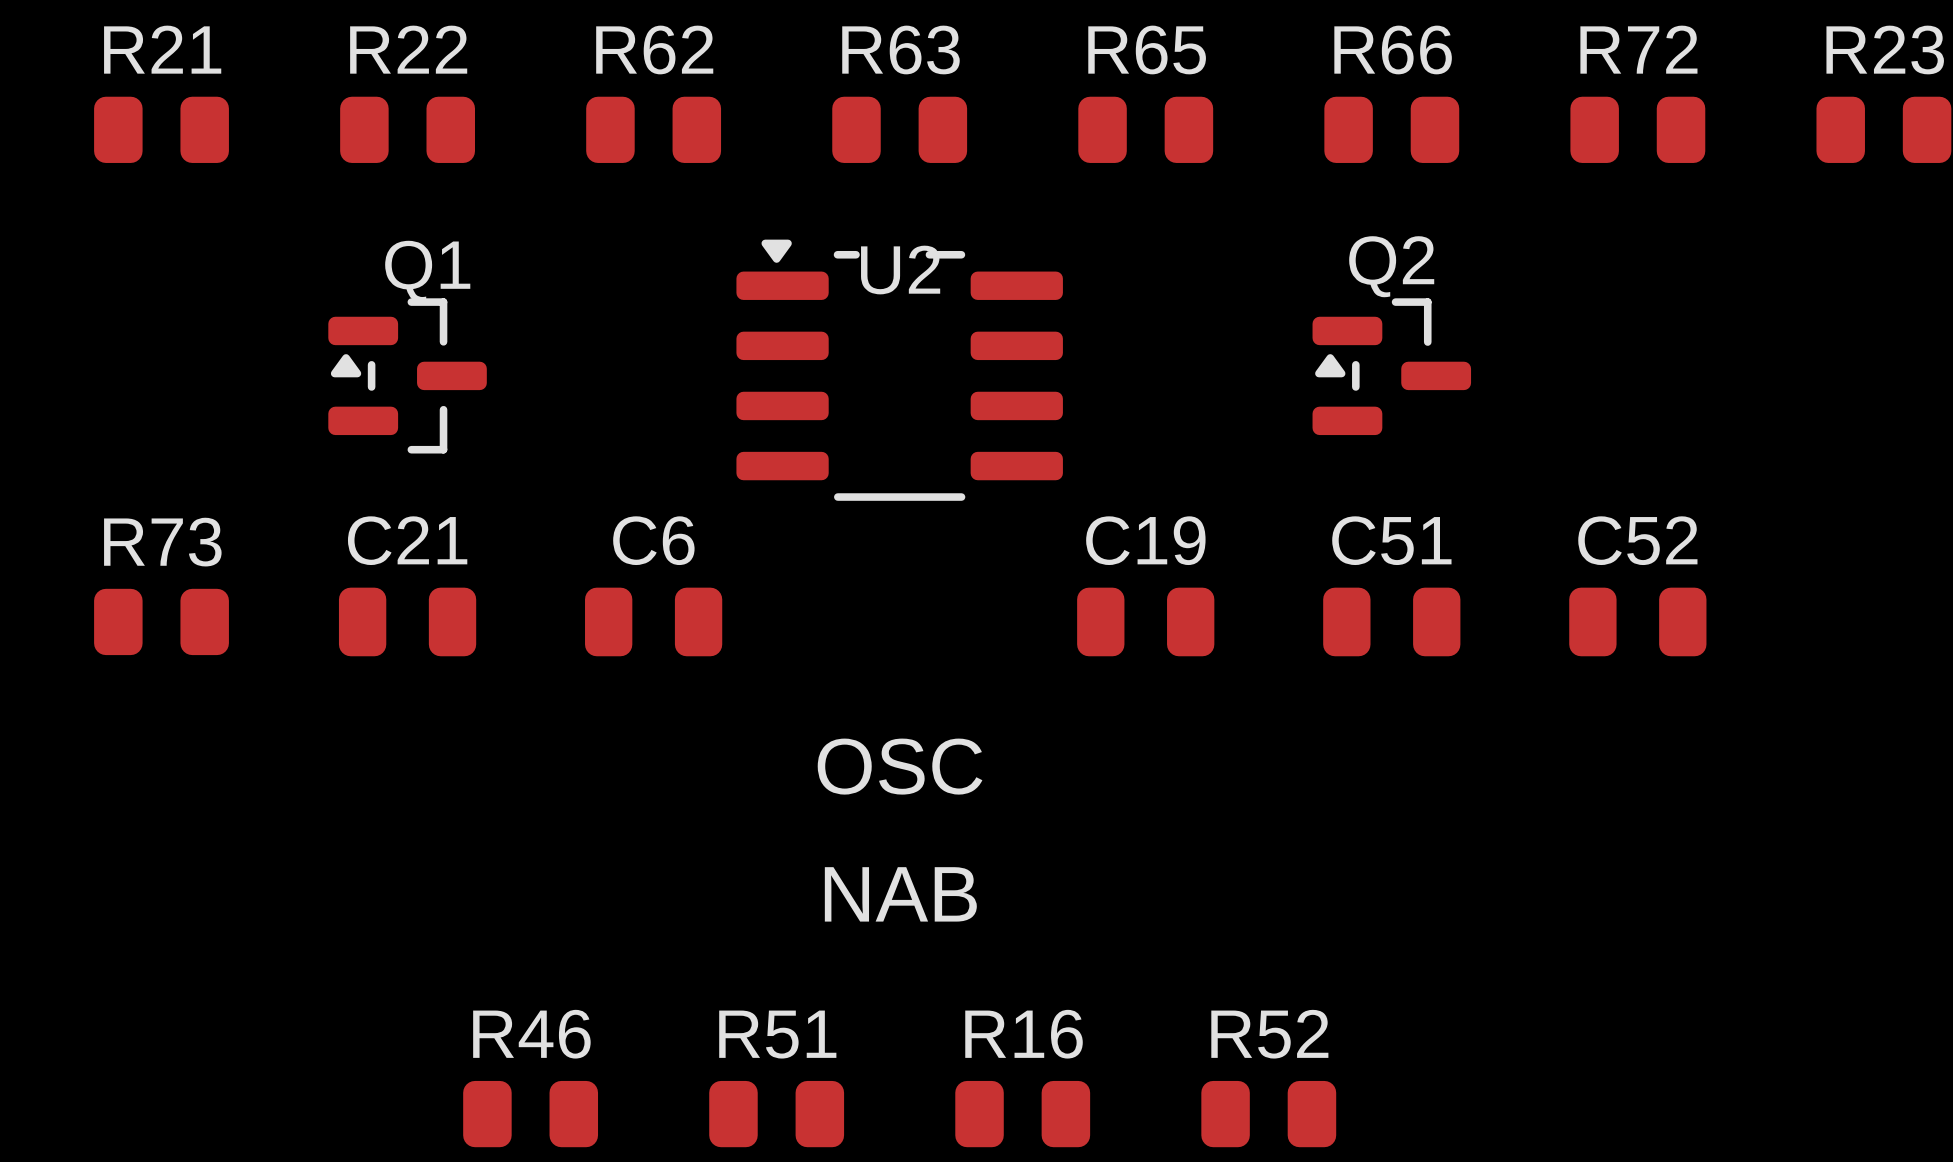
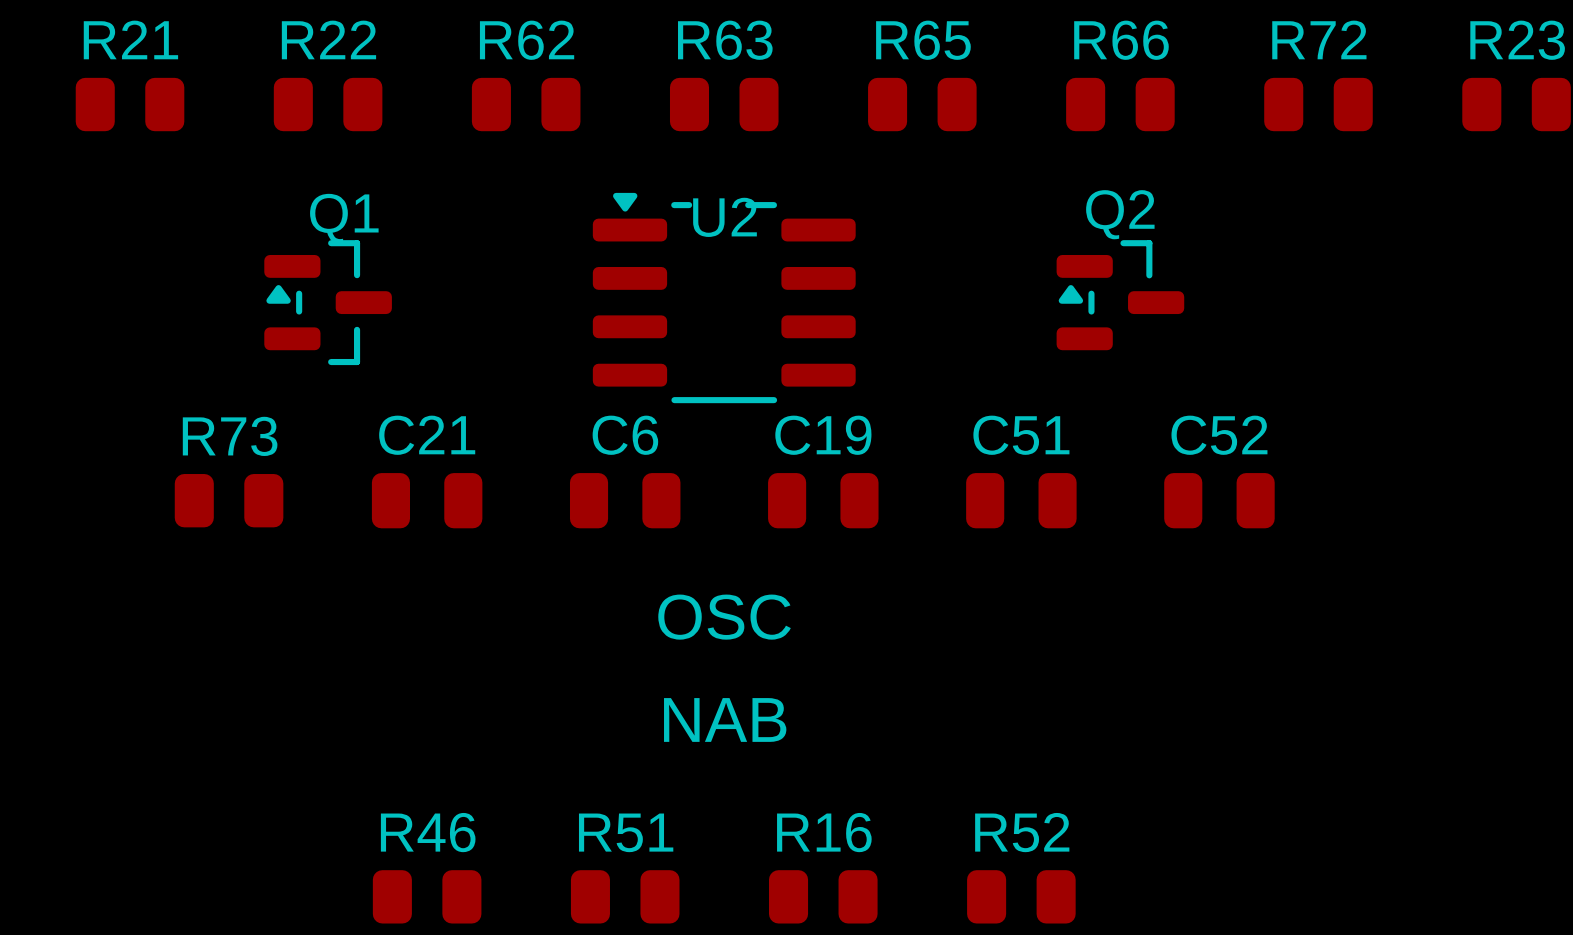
R73 position: (161, 621) -> (229, 500)
C21 position: (407, 621) -> (427, 500)
C6 position: (653, 621) -> (625, 500)
C19 position: (1145, 621) -> (823, 500)
C51 position: (1391, 621) -> (1021, 500)
C52 position: (1637, 621) -> (1219, 500)

